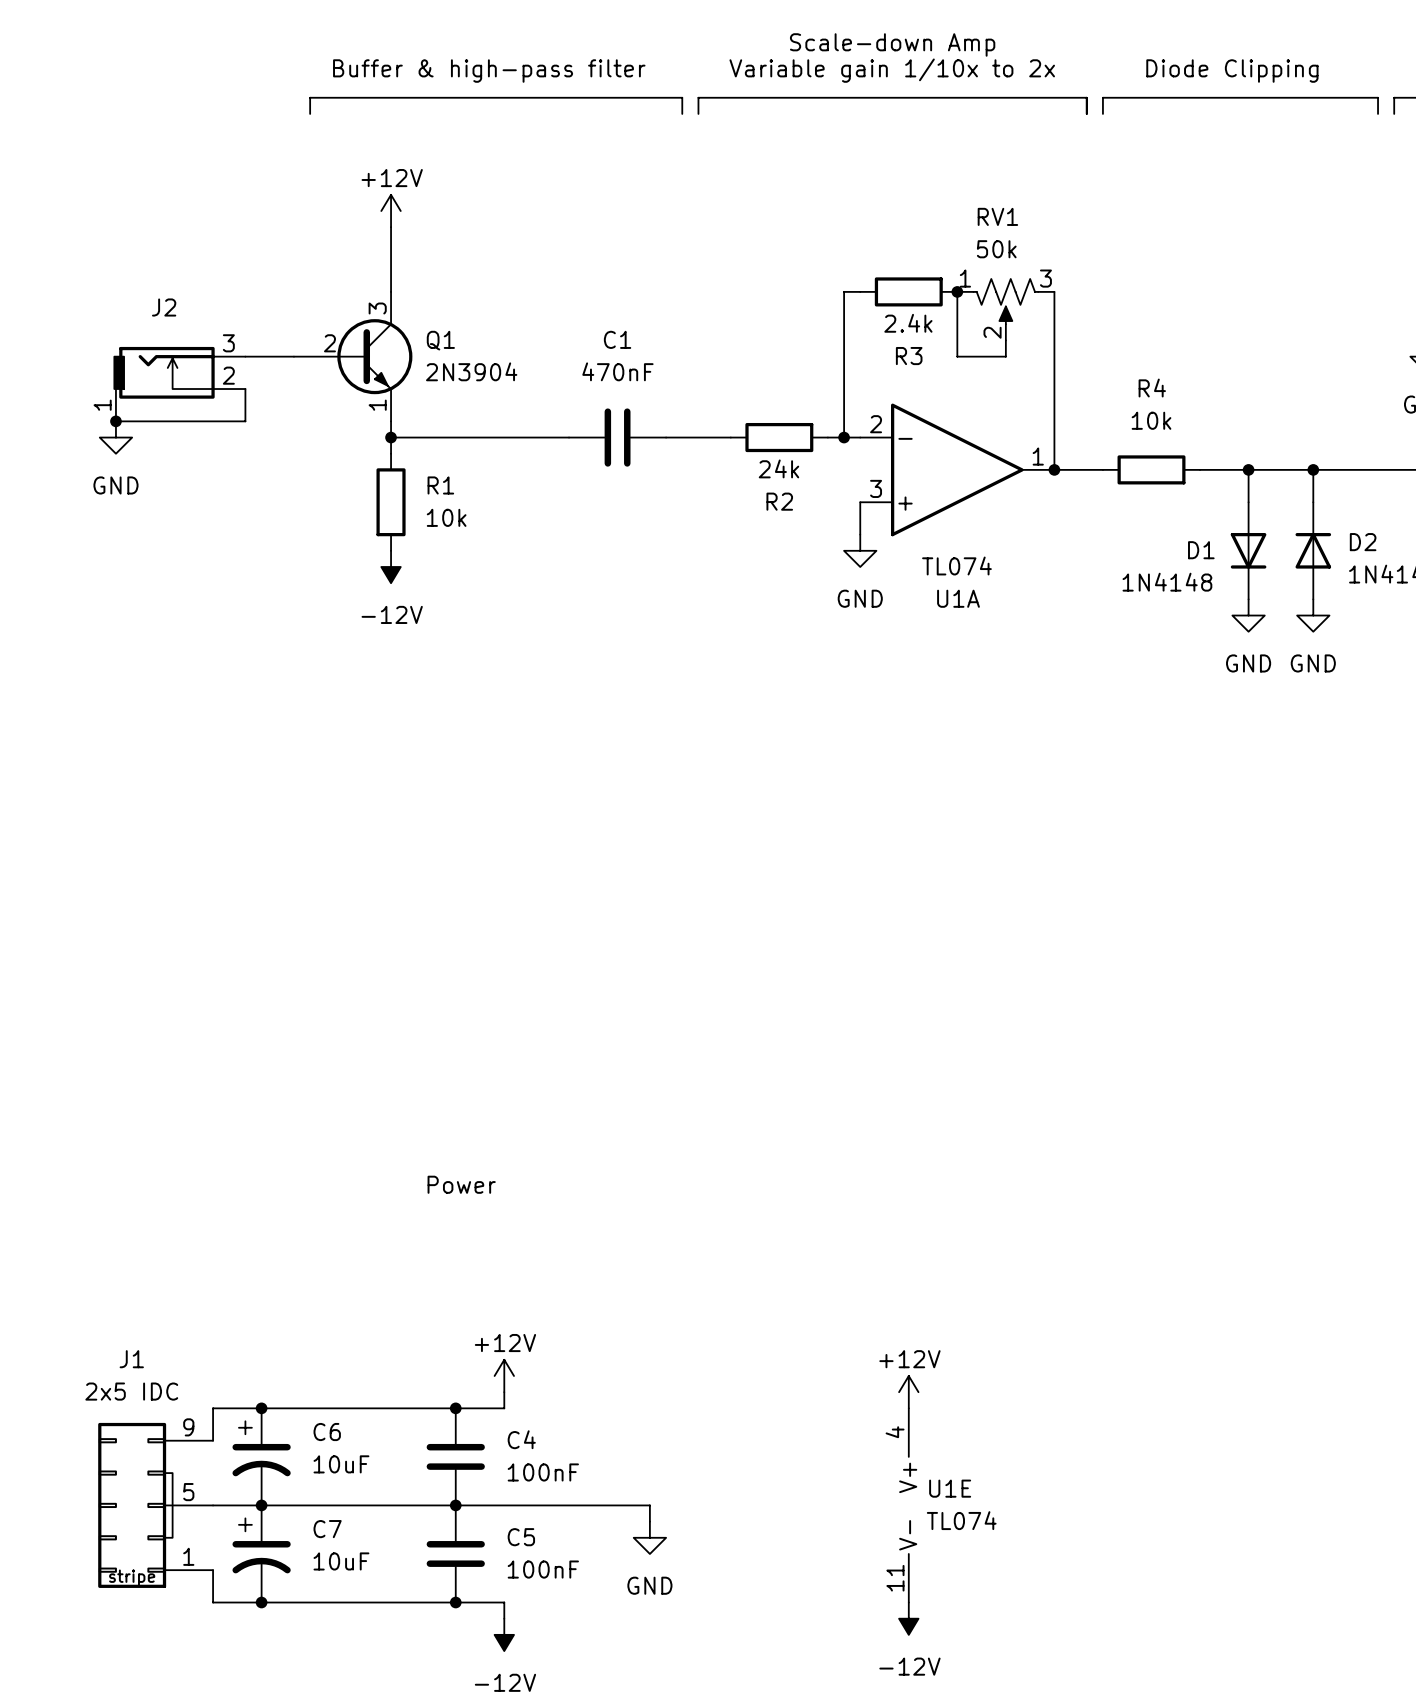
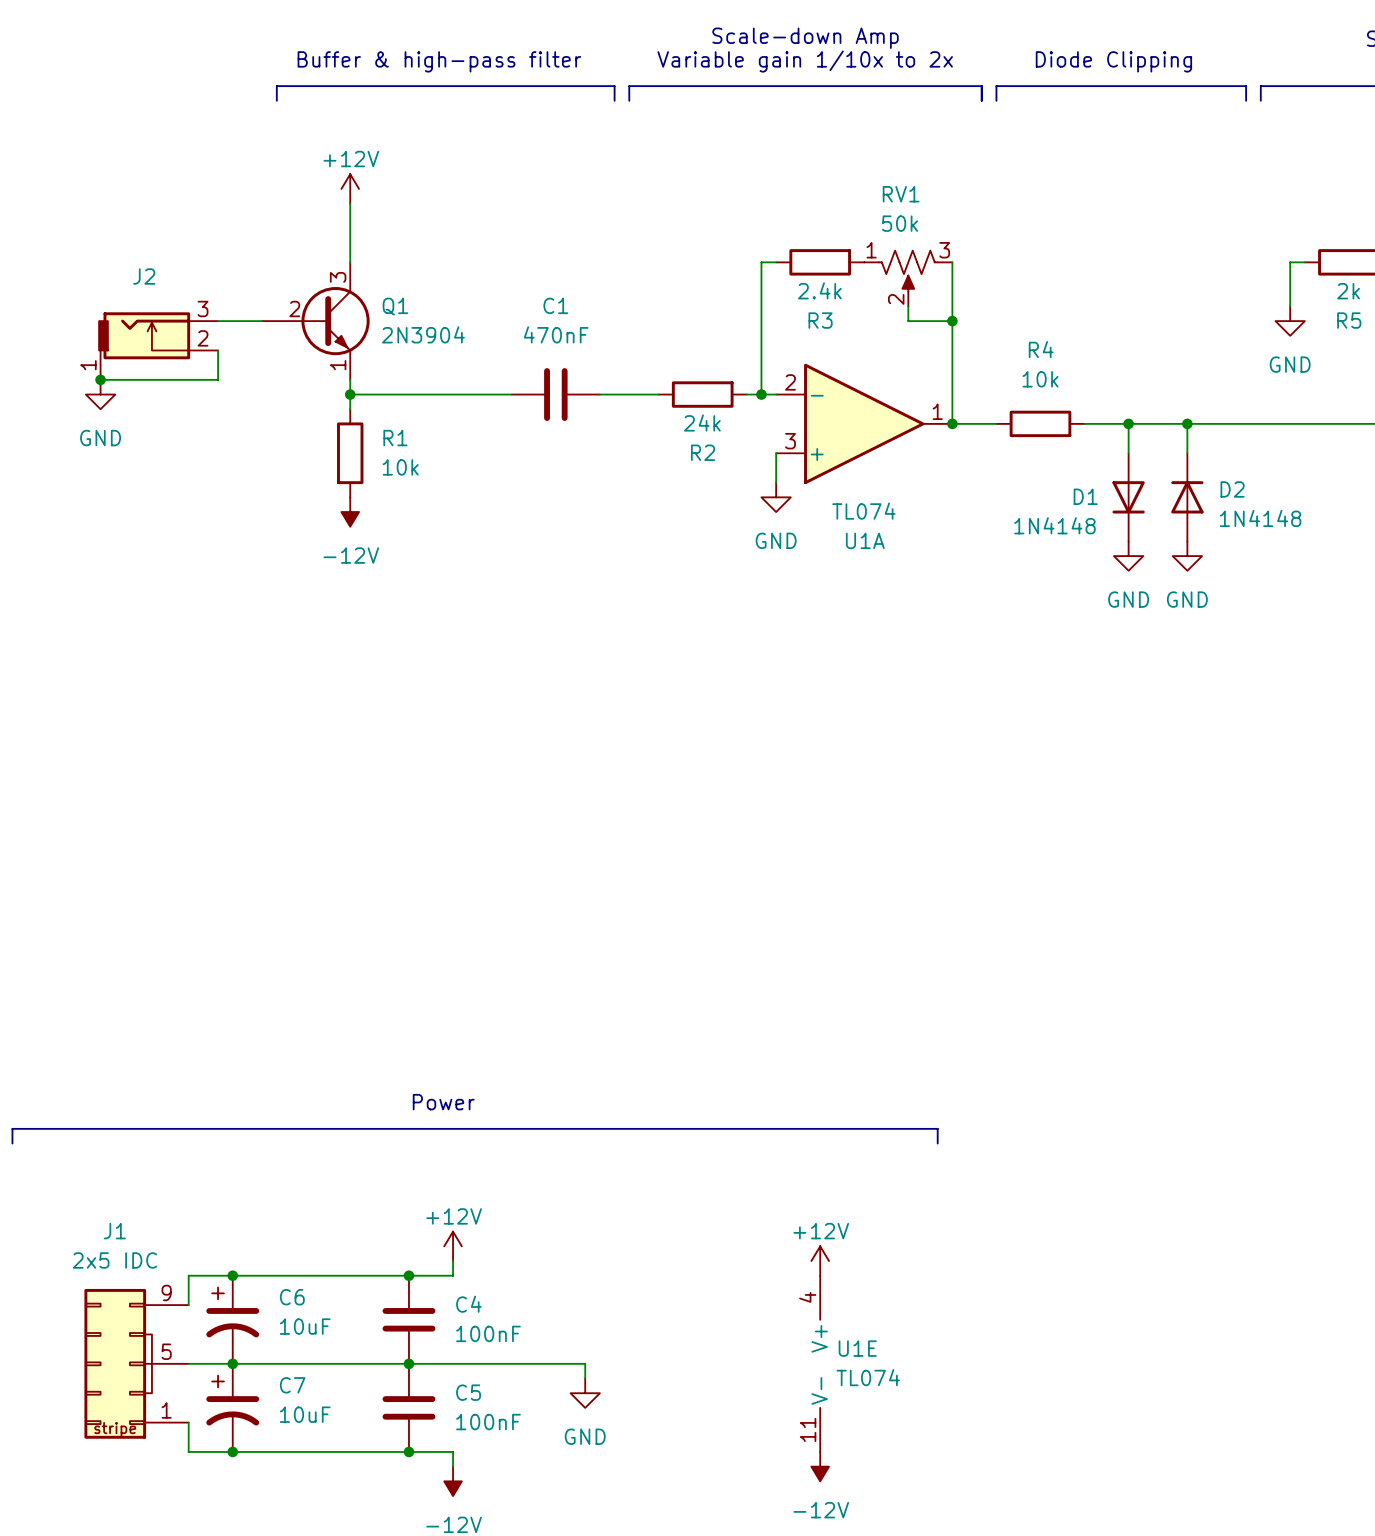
wire: (957, 291) (957, 356) (1005, 356) -> (952, 321) (908, 321)
junction: (957, 291) -> none
junction: none -> (952, 321)
text position: Power (461, 1184) -> Power (443, 1102)
line: none -> (12, 1143) (12, 1128) (937, 1128) (937, 1143)

